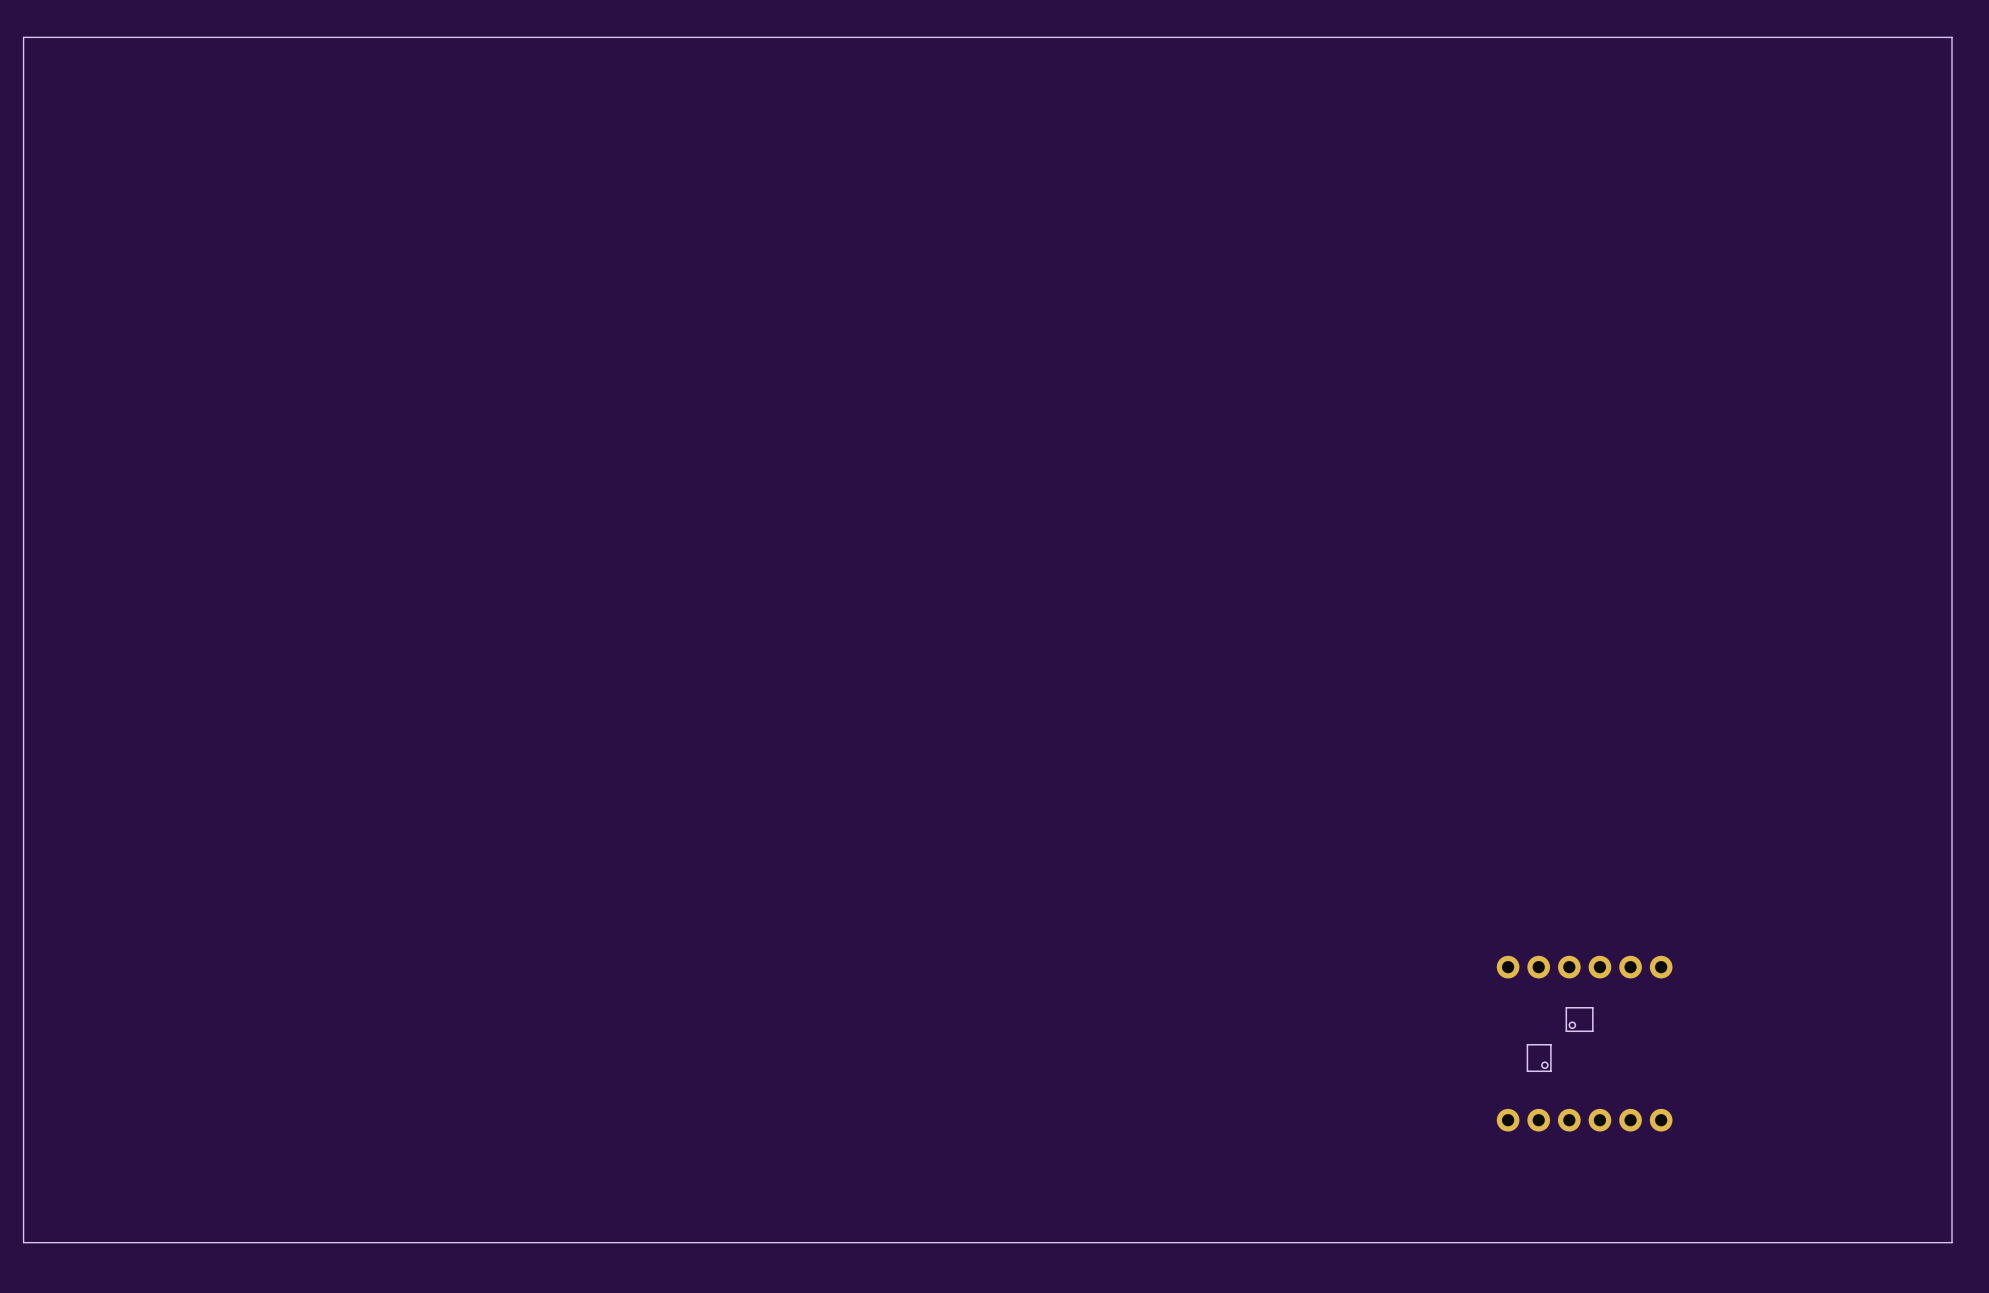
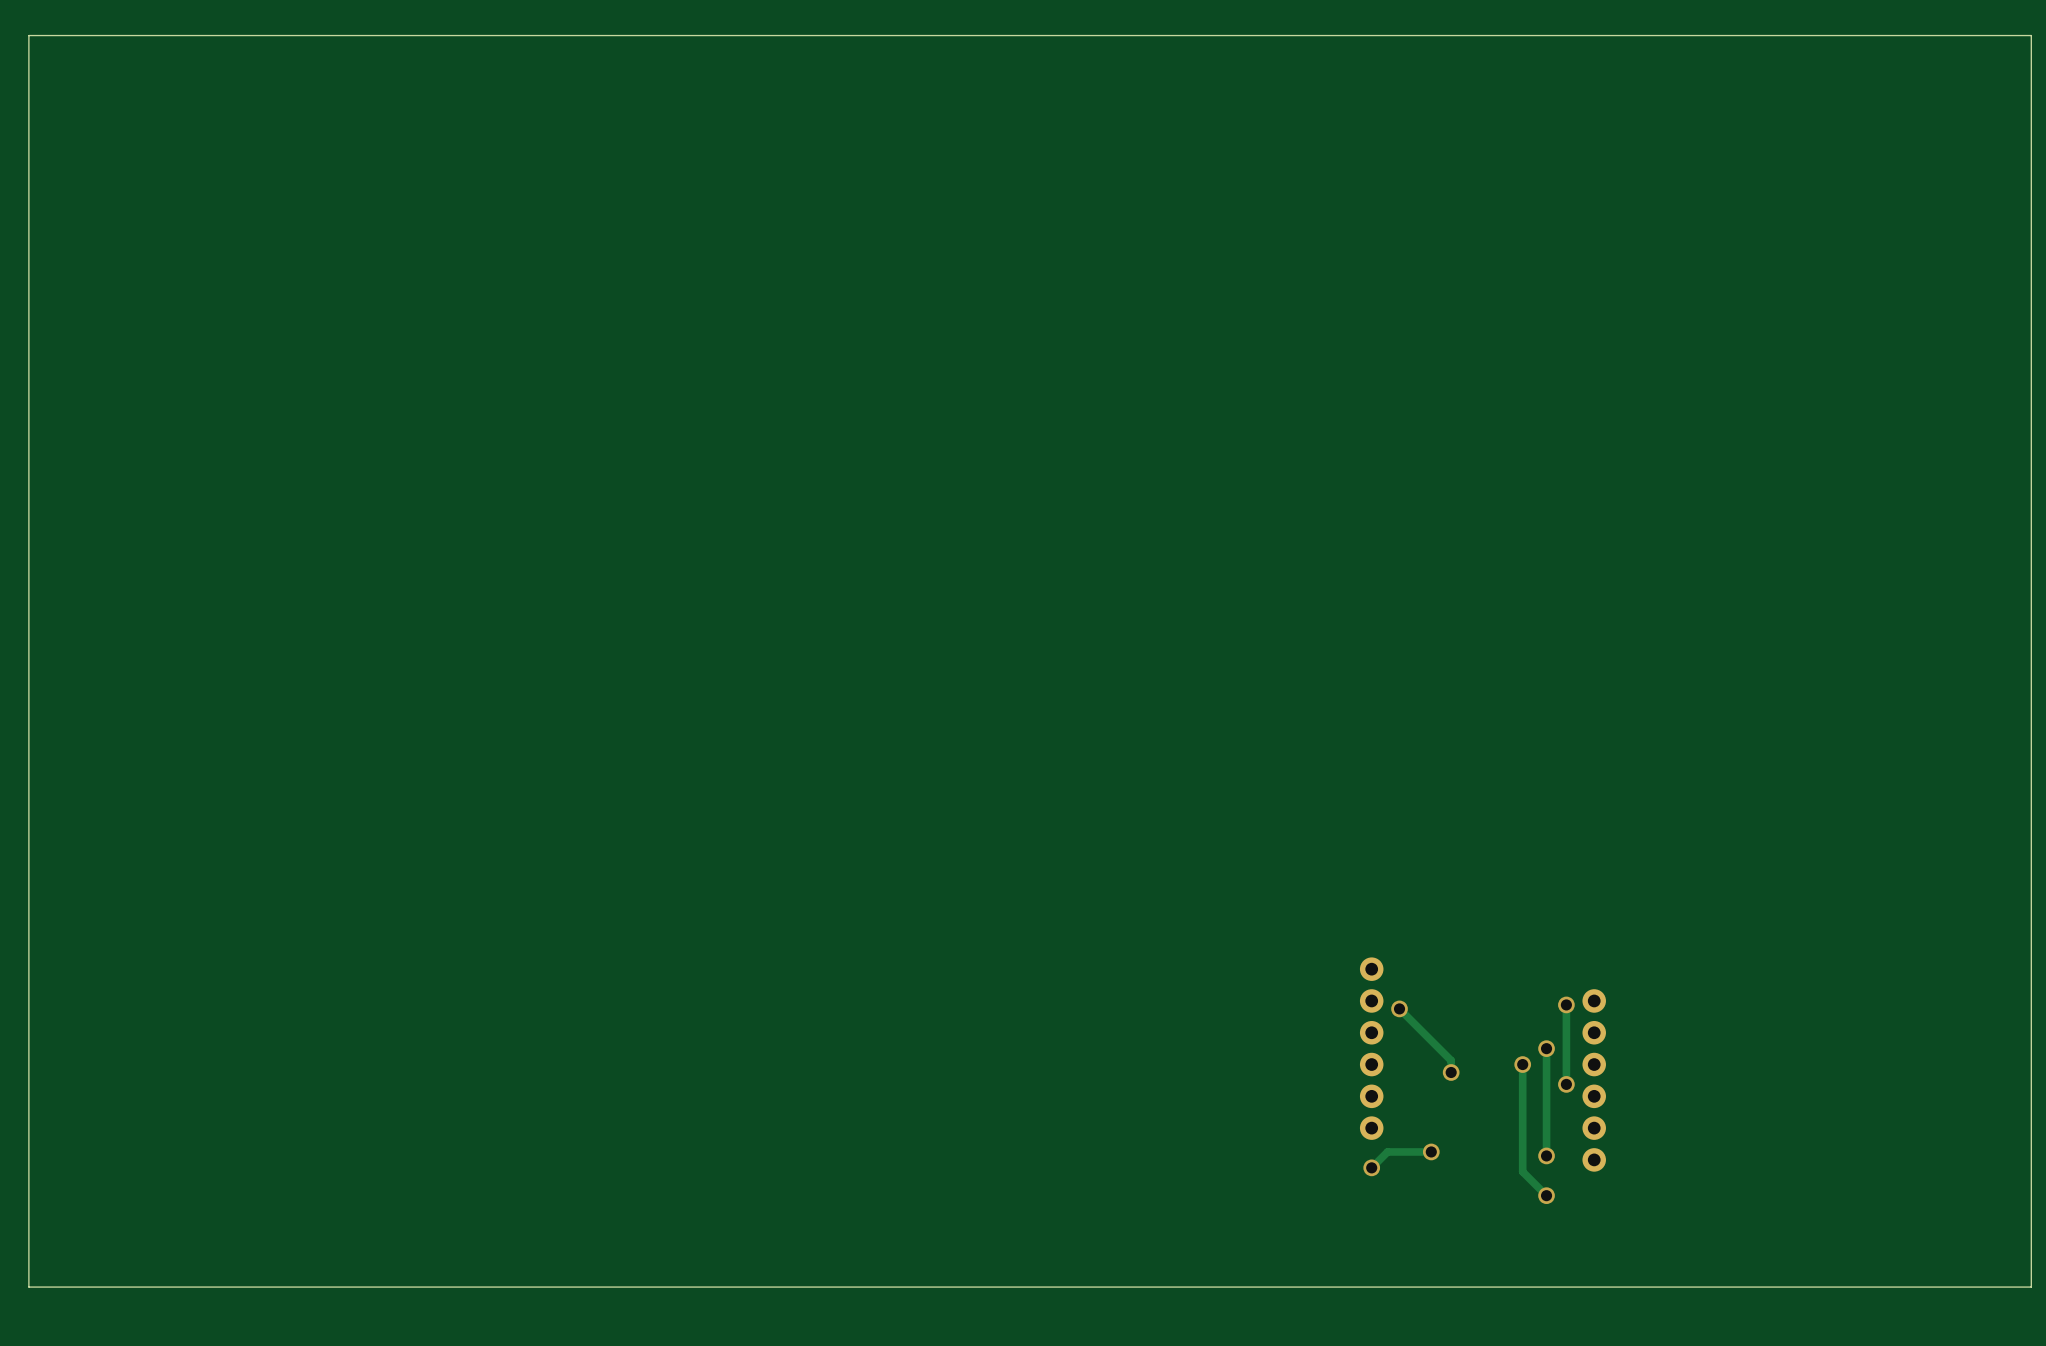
part: none -> (1371, 969)
part: (1523, 967) -> none
part: (1584, 967) -> none
part: (1645, 967) -> none
track: none -> (1566, 1004) (1566, 1084)
via: none -> (1566, 1004)
track: none -> (1399, 1008) (1451, 1060) (1451, 1072)
via: none -> (1399, 1008)
track: none -> (1546, 1048) (1546, 1155)
via: none -> (1546, 1048)
part: (1579, 1019) -> none
part: none -> (1371, 1064)
track: none -> (1522, 1064) (1522, 1171) (1546, 1195)
via: none -> (1522, 1064)
part: none -> (1594, 1064)
via: none -> (1451, 1072)
via: none -> (1566, 1084)
part: (1539, 1058) -> none
part footprint: [1496, 1108, 1551, 1132] -> [1582, 1148, 1606, 1172]
track: none -> (1431, 1151) (1387, 1151) (1371, 1167)
via: none -> (1431, 1151)
via: none -> (1546, 1155)
part: (1584, 1120) -> none
part: (1645, 1120) -> none
via: none -> (1371, 1167)
via: none -> (1546, 1195)

